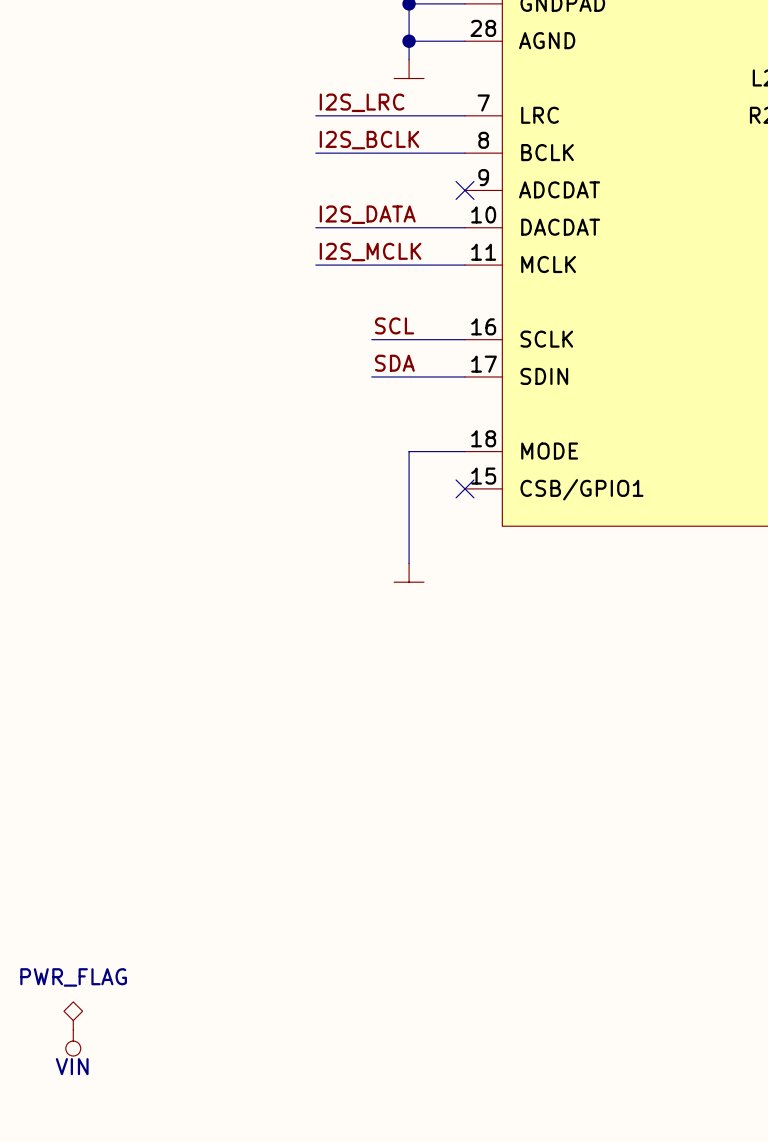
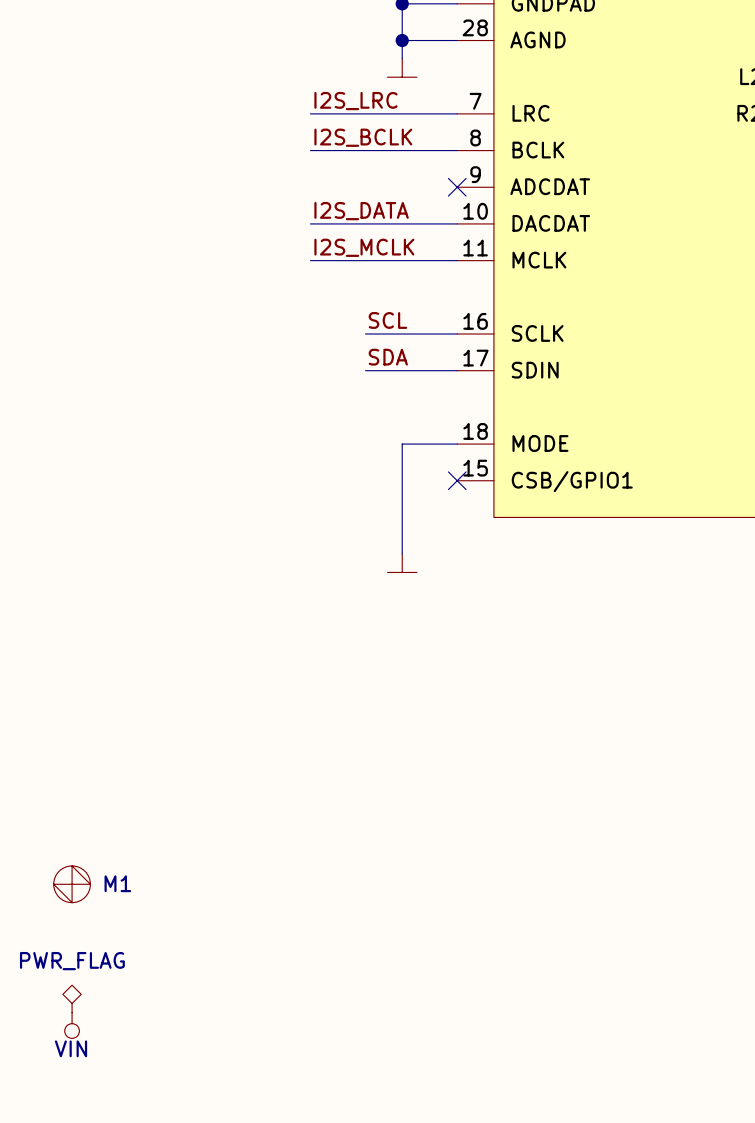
M1: none -> (72, 884)

